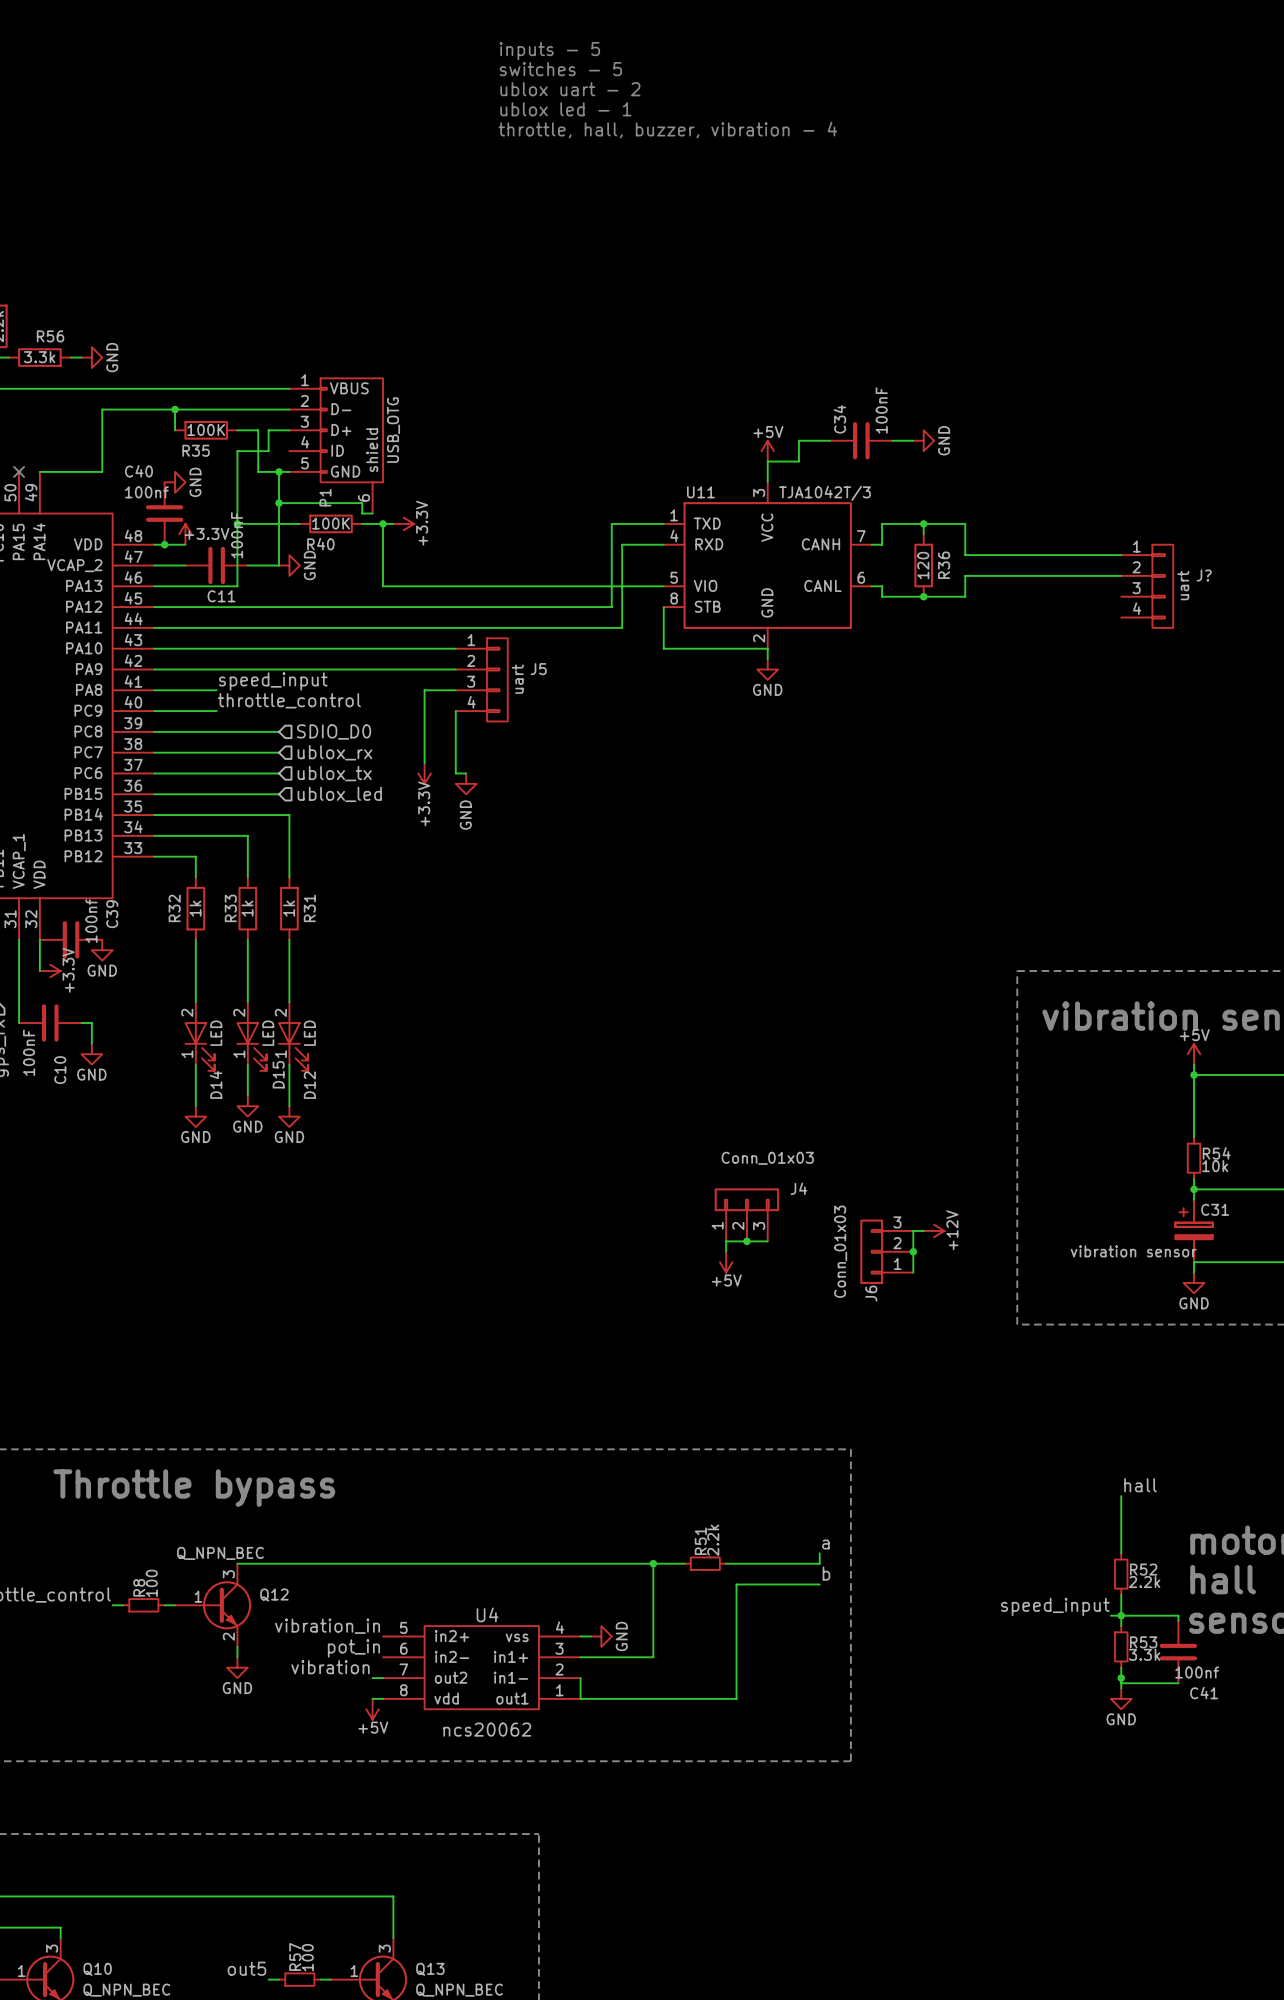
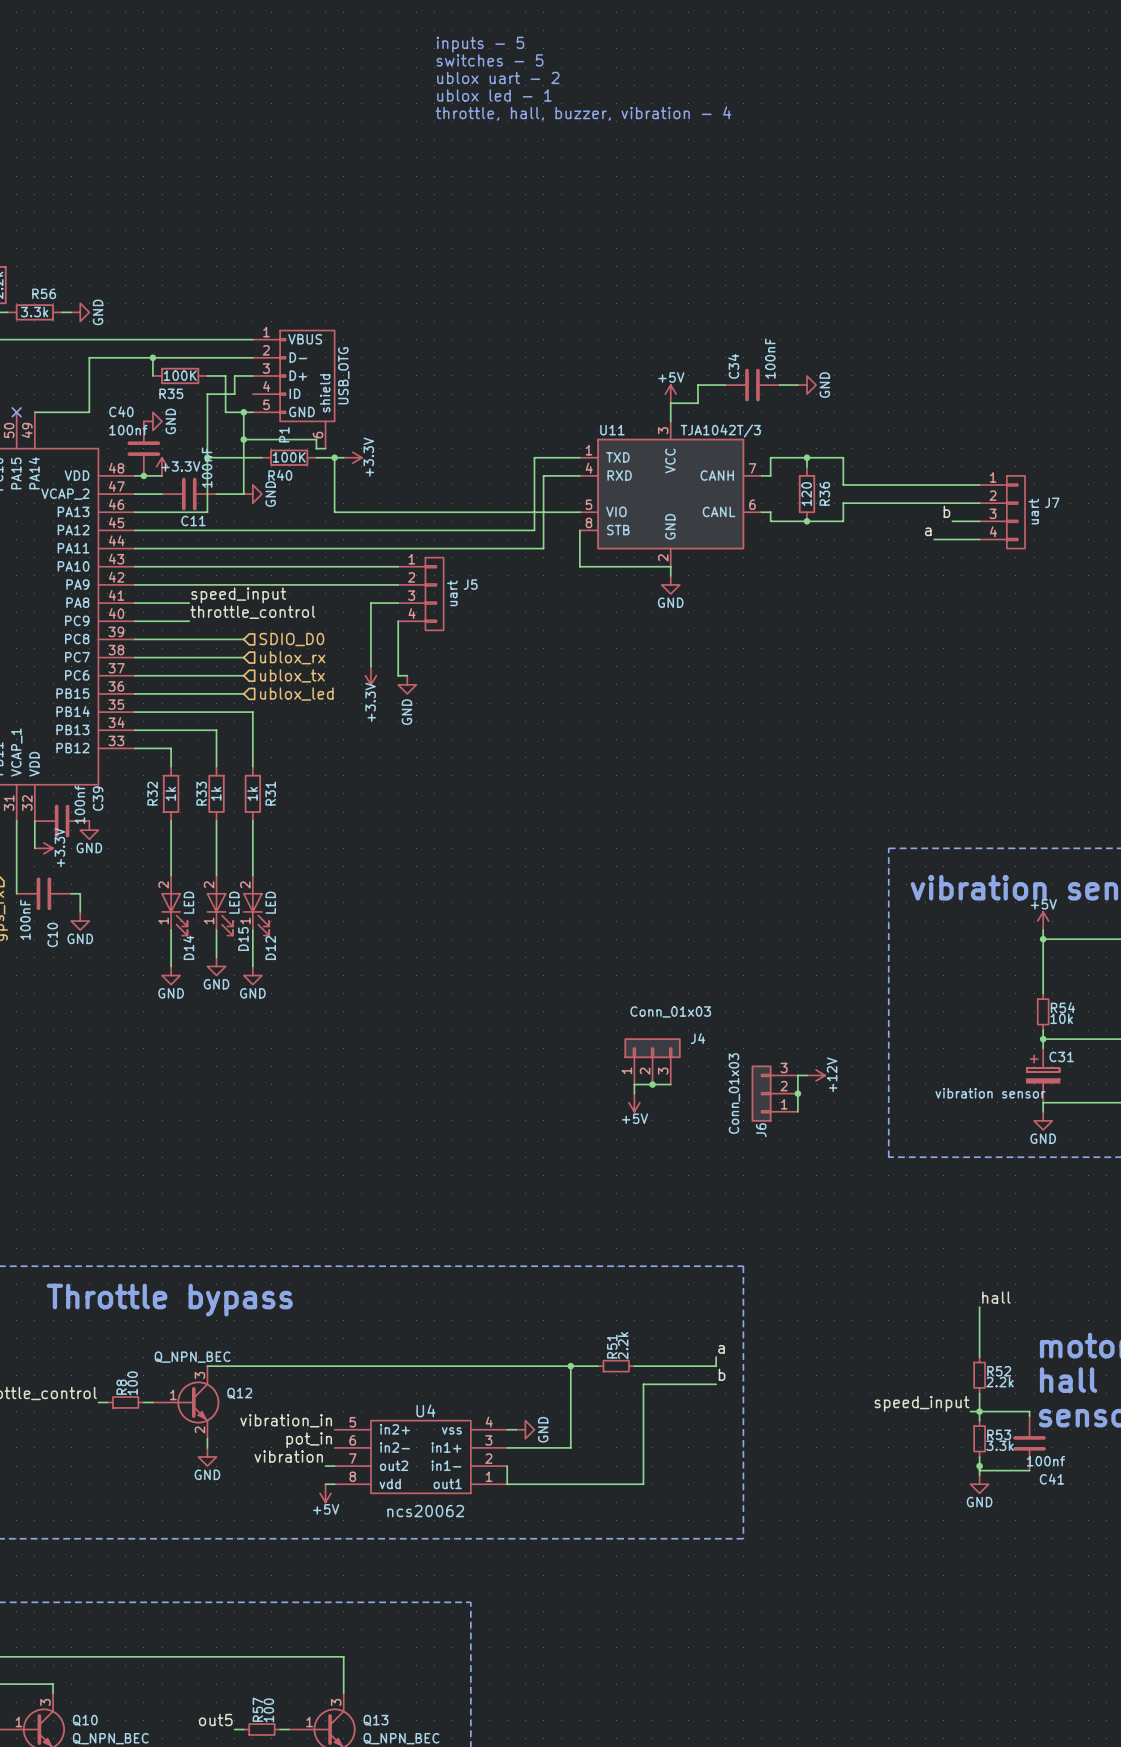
J? name: J? (1204, 575) -> J7 (1052, 502)
label: none -> b (946, 511)
wire: none -> (952, 521) (979, 521)
label: none -> a (928, 531)
wire: none -> (934, 539) (979, 539)

